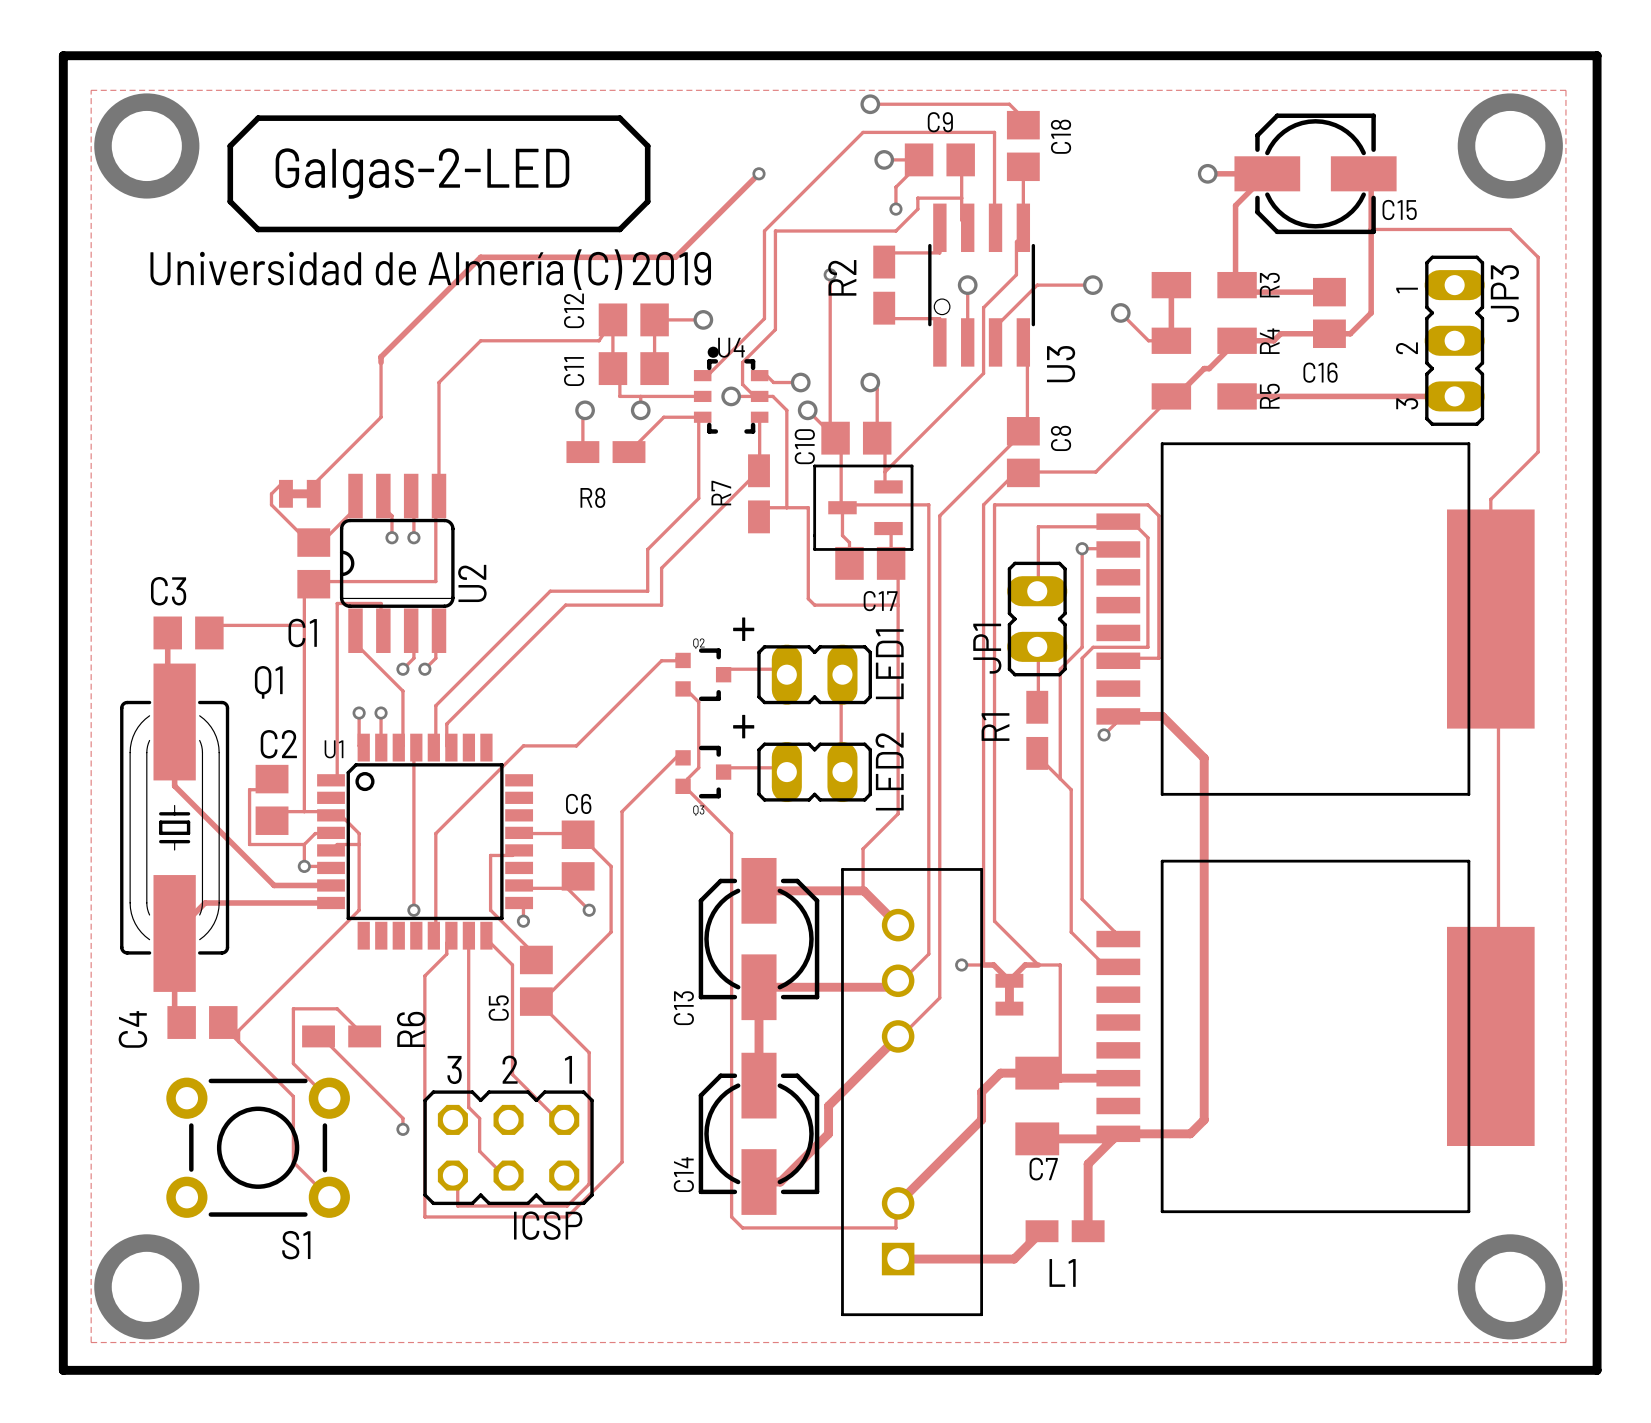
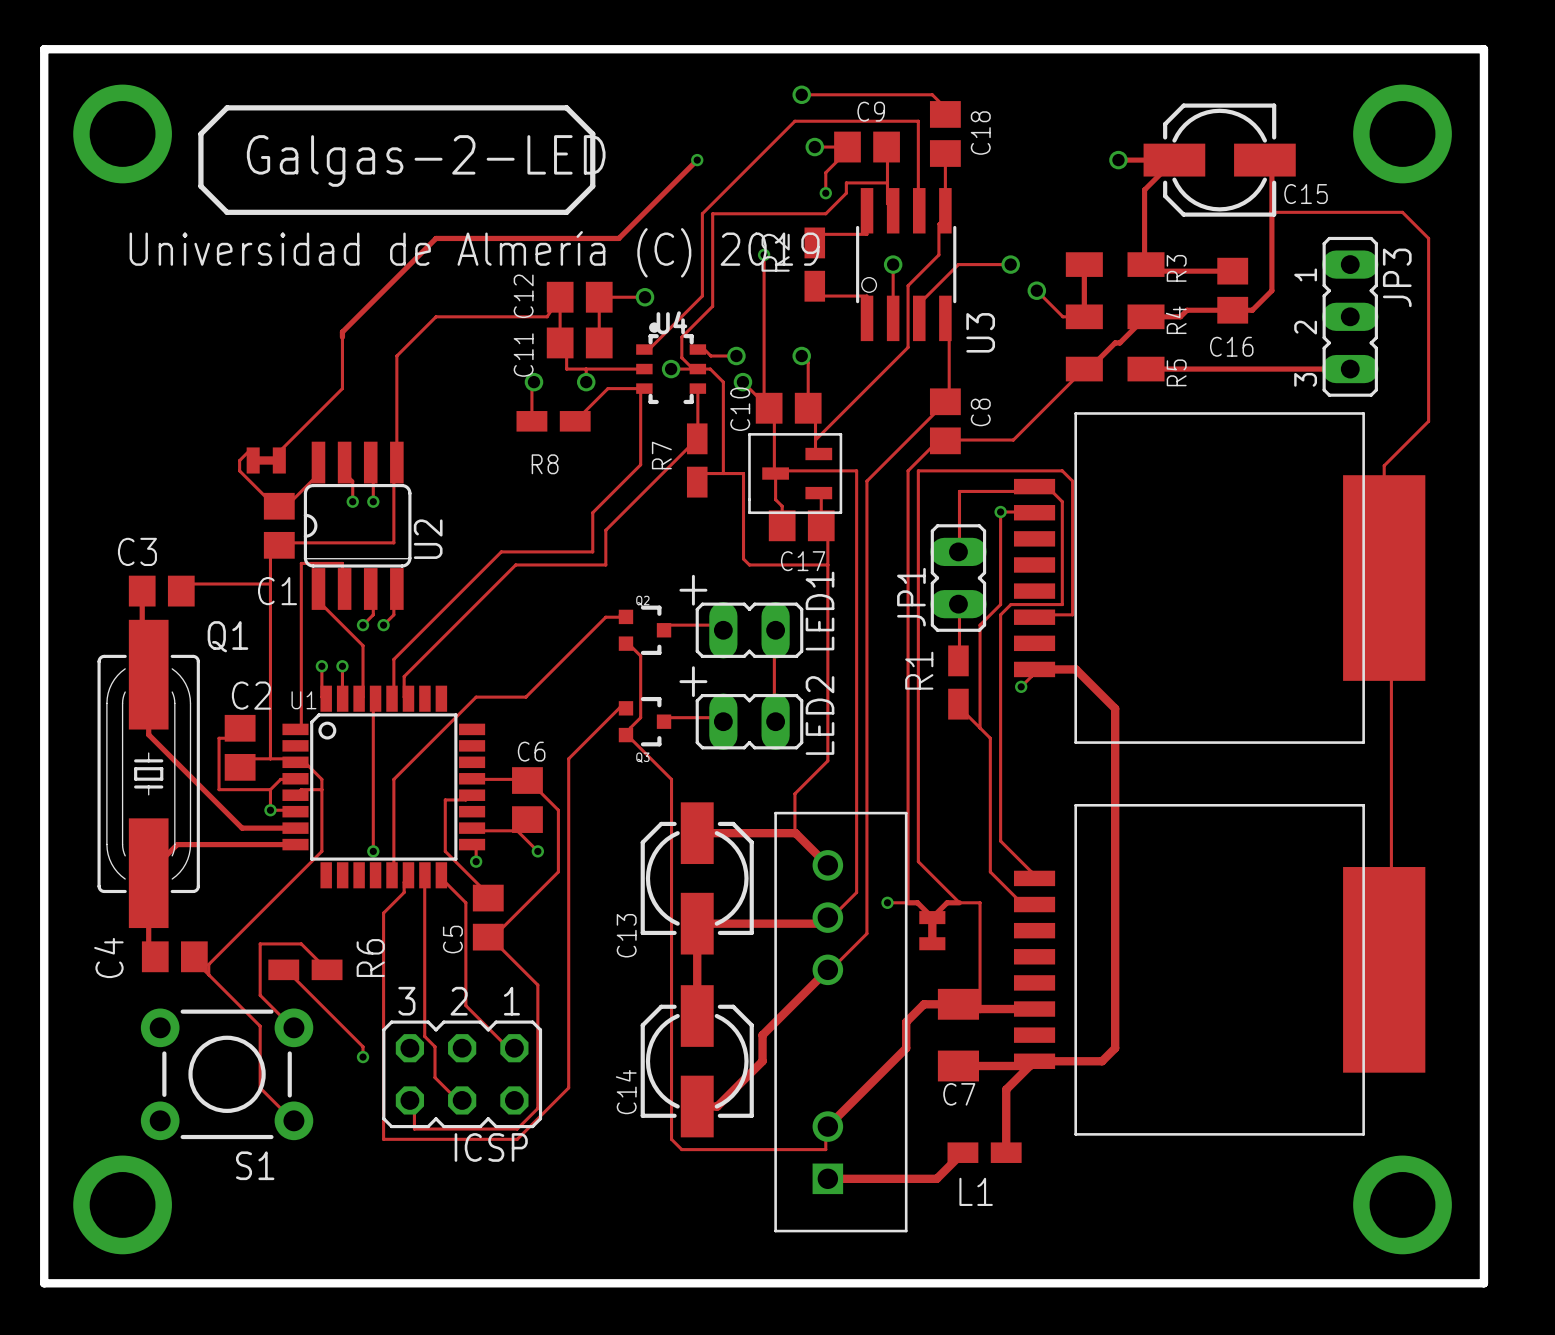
zone outline: (91, 90) (1565, 90) (1565, 1342) (91, 1342) (91, 90) -> none

